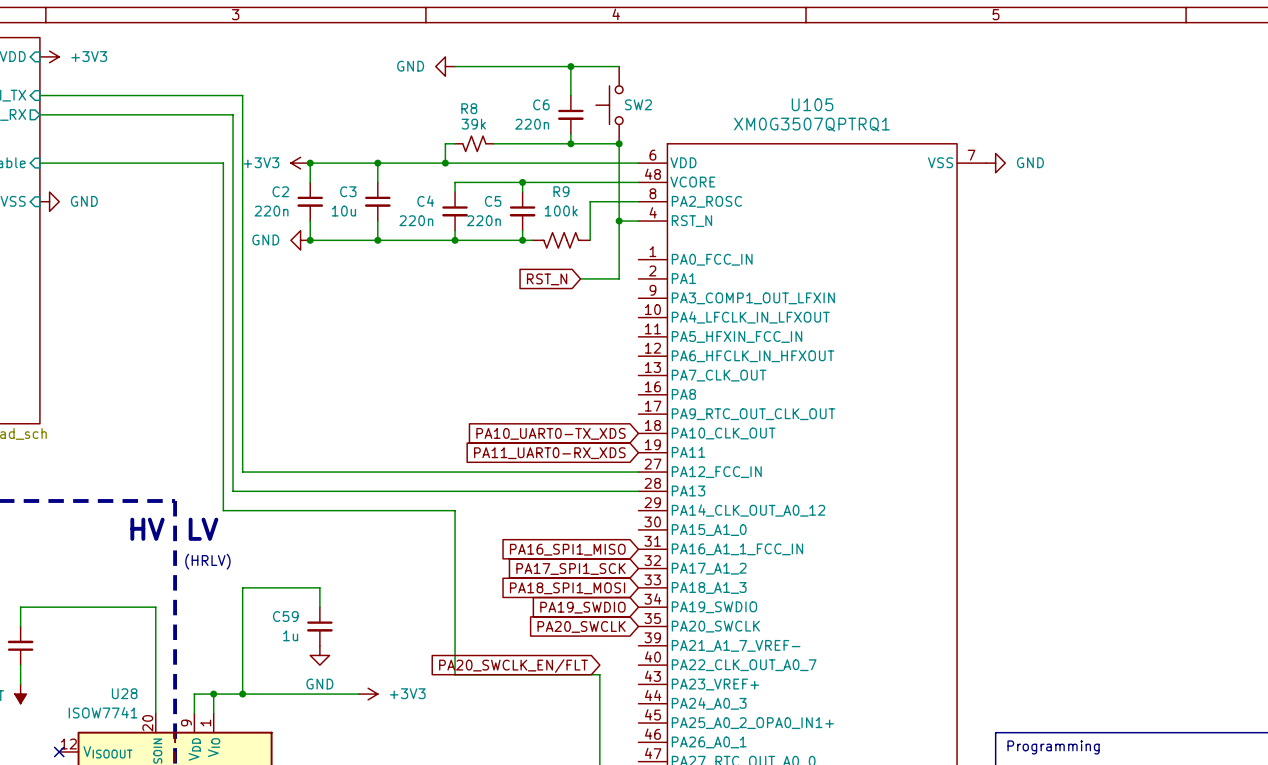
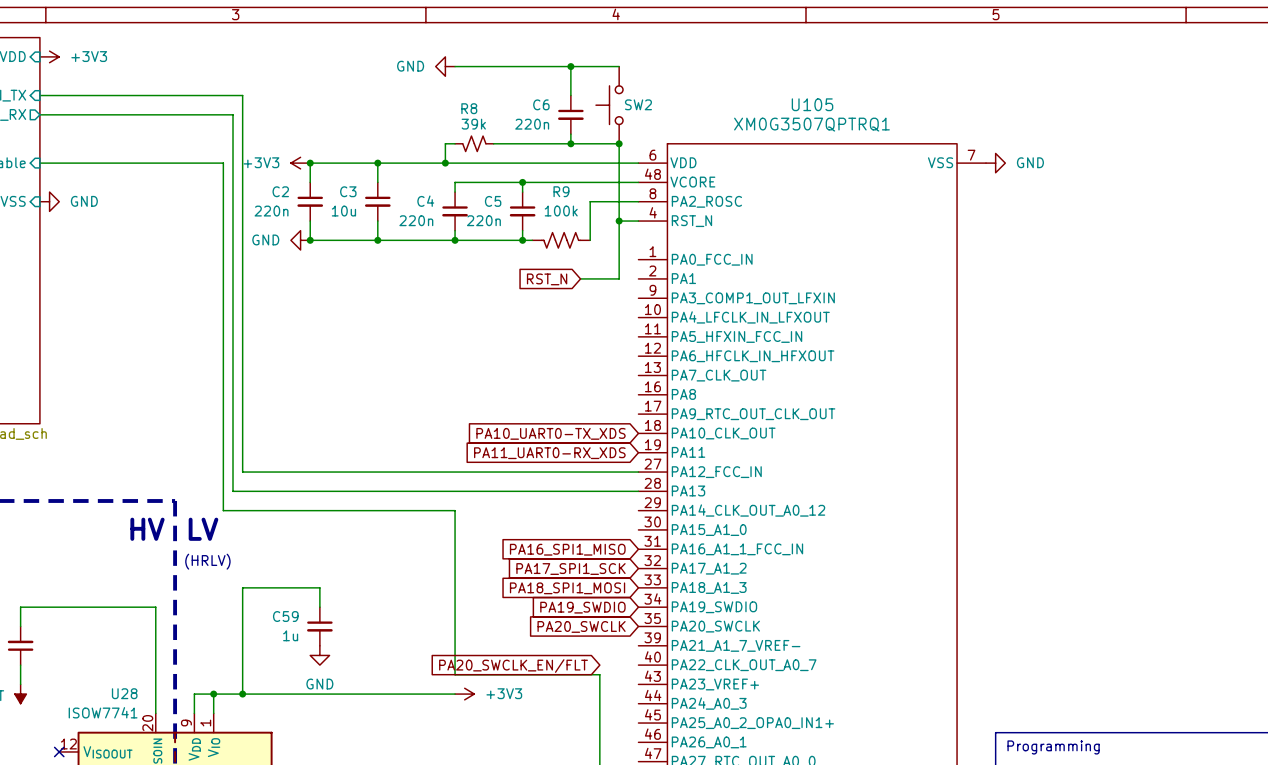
wire: none -> (358, 694) (455, 694)
power symbol position: +3V3 (368, 694) -> +3V3 (464, 694)

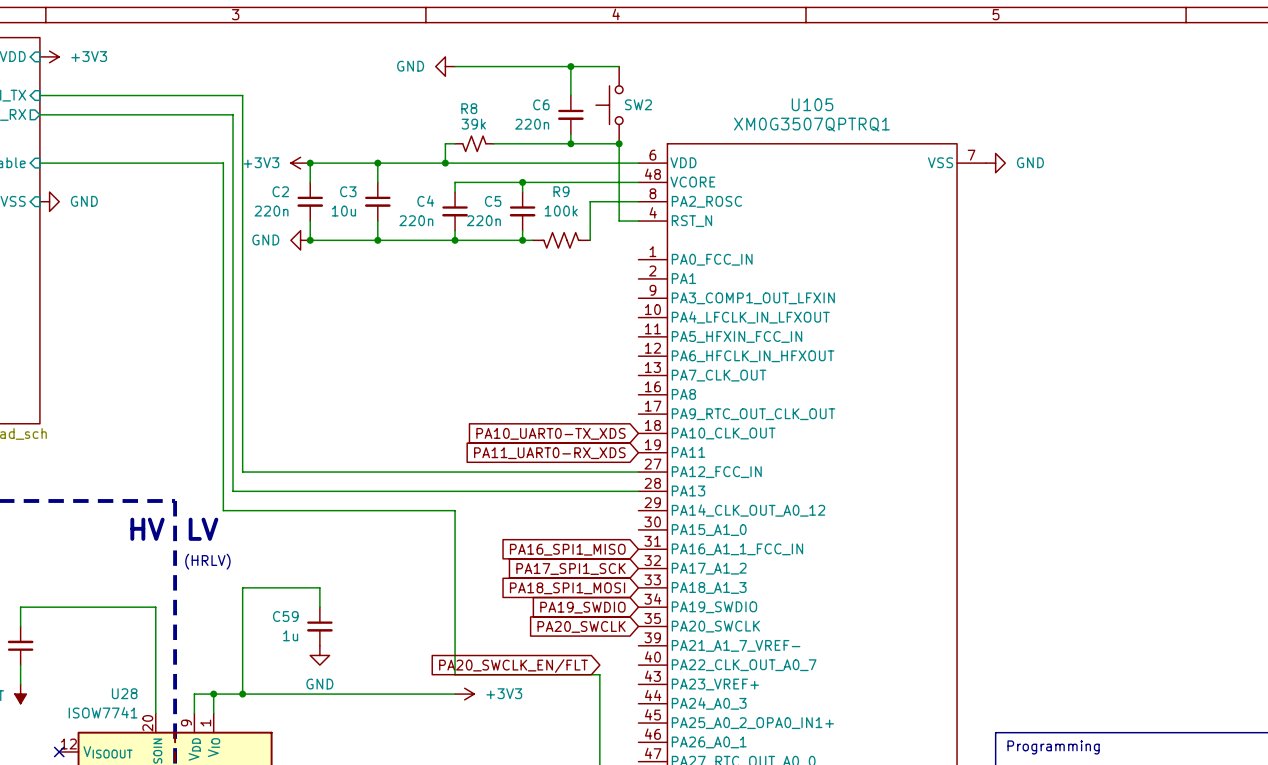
wire: (619, 221) (619, 278) (580, 278) -> none
junction: (619, 221) -> none
global label: RST_N (547, 279) -> none

